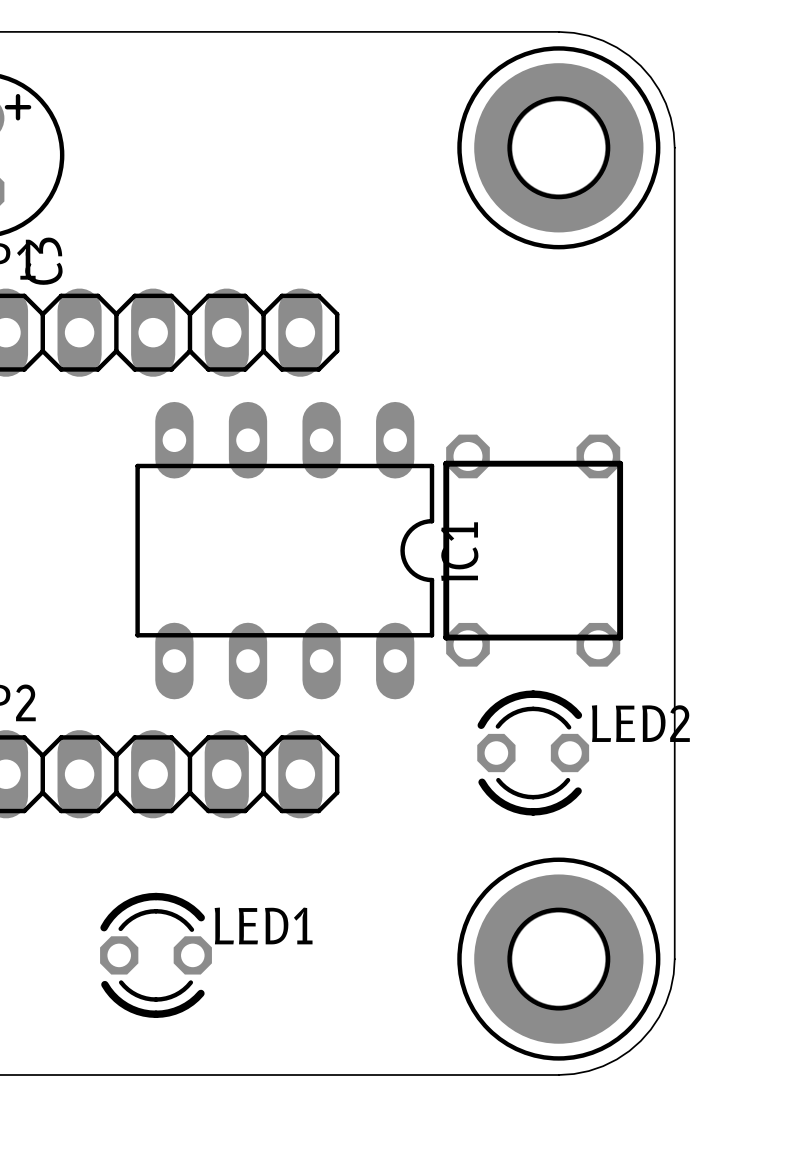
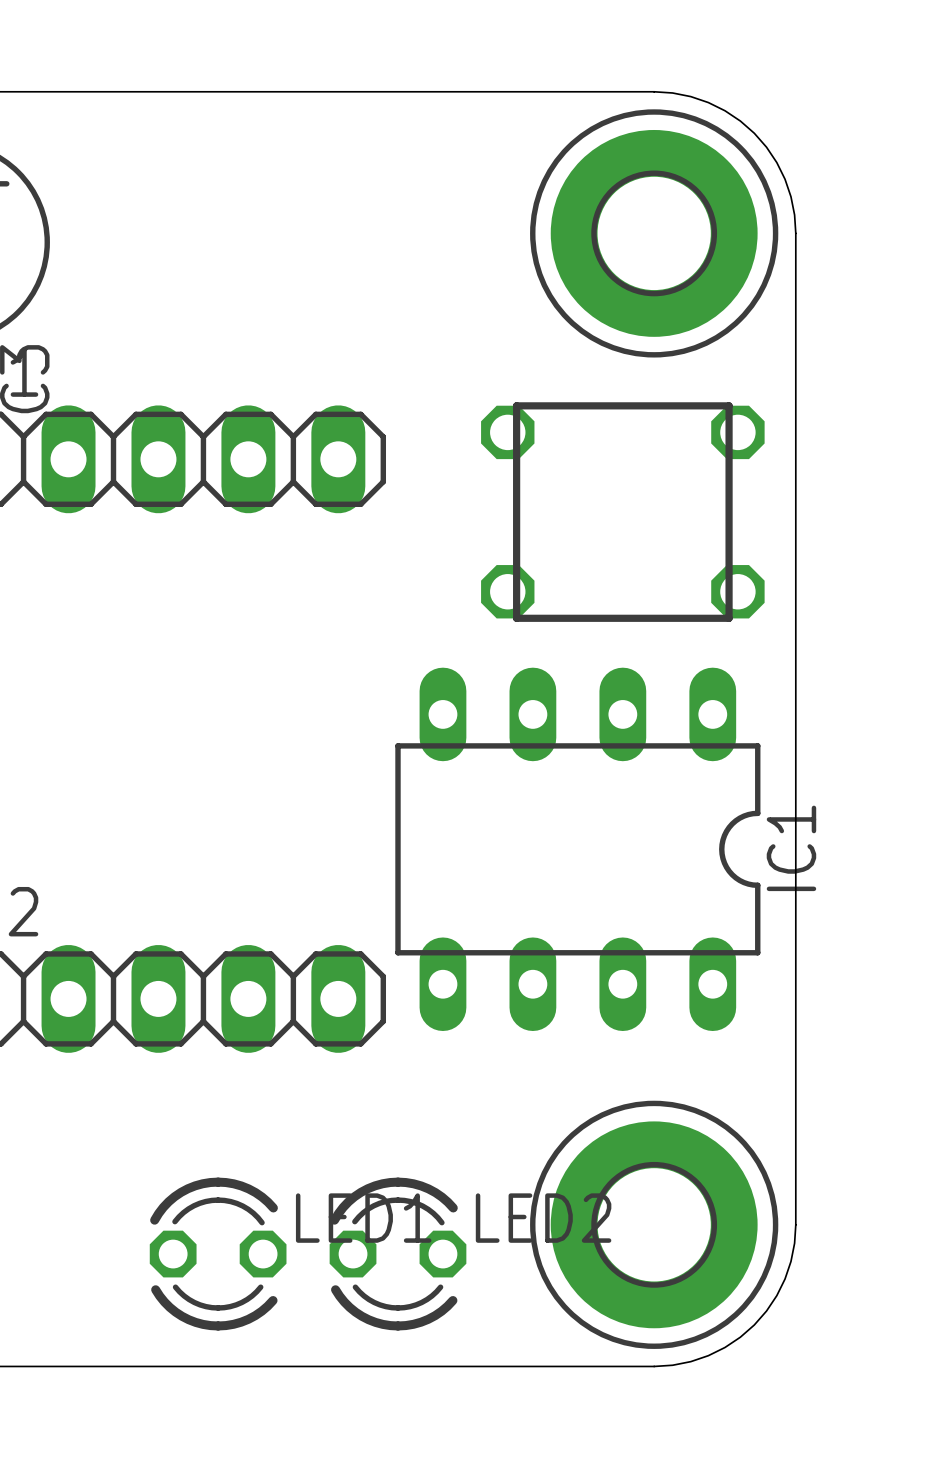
IC1 position: (284, 550) -> (577, 849)
part rotation: 0° (533, 550) -> 90° clockwise (622, 512)
part position: (533, 550) -> (622, 512)
LED2 position: (533, 753) -> (398, 1254)
LED1 position: (156, 955) -> (218, 1254)

